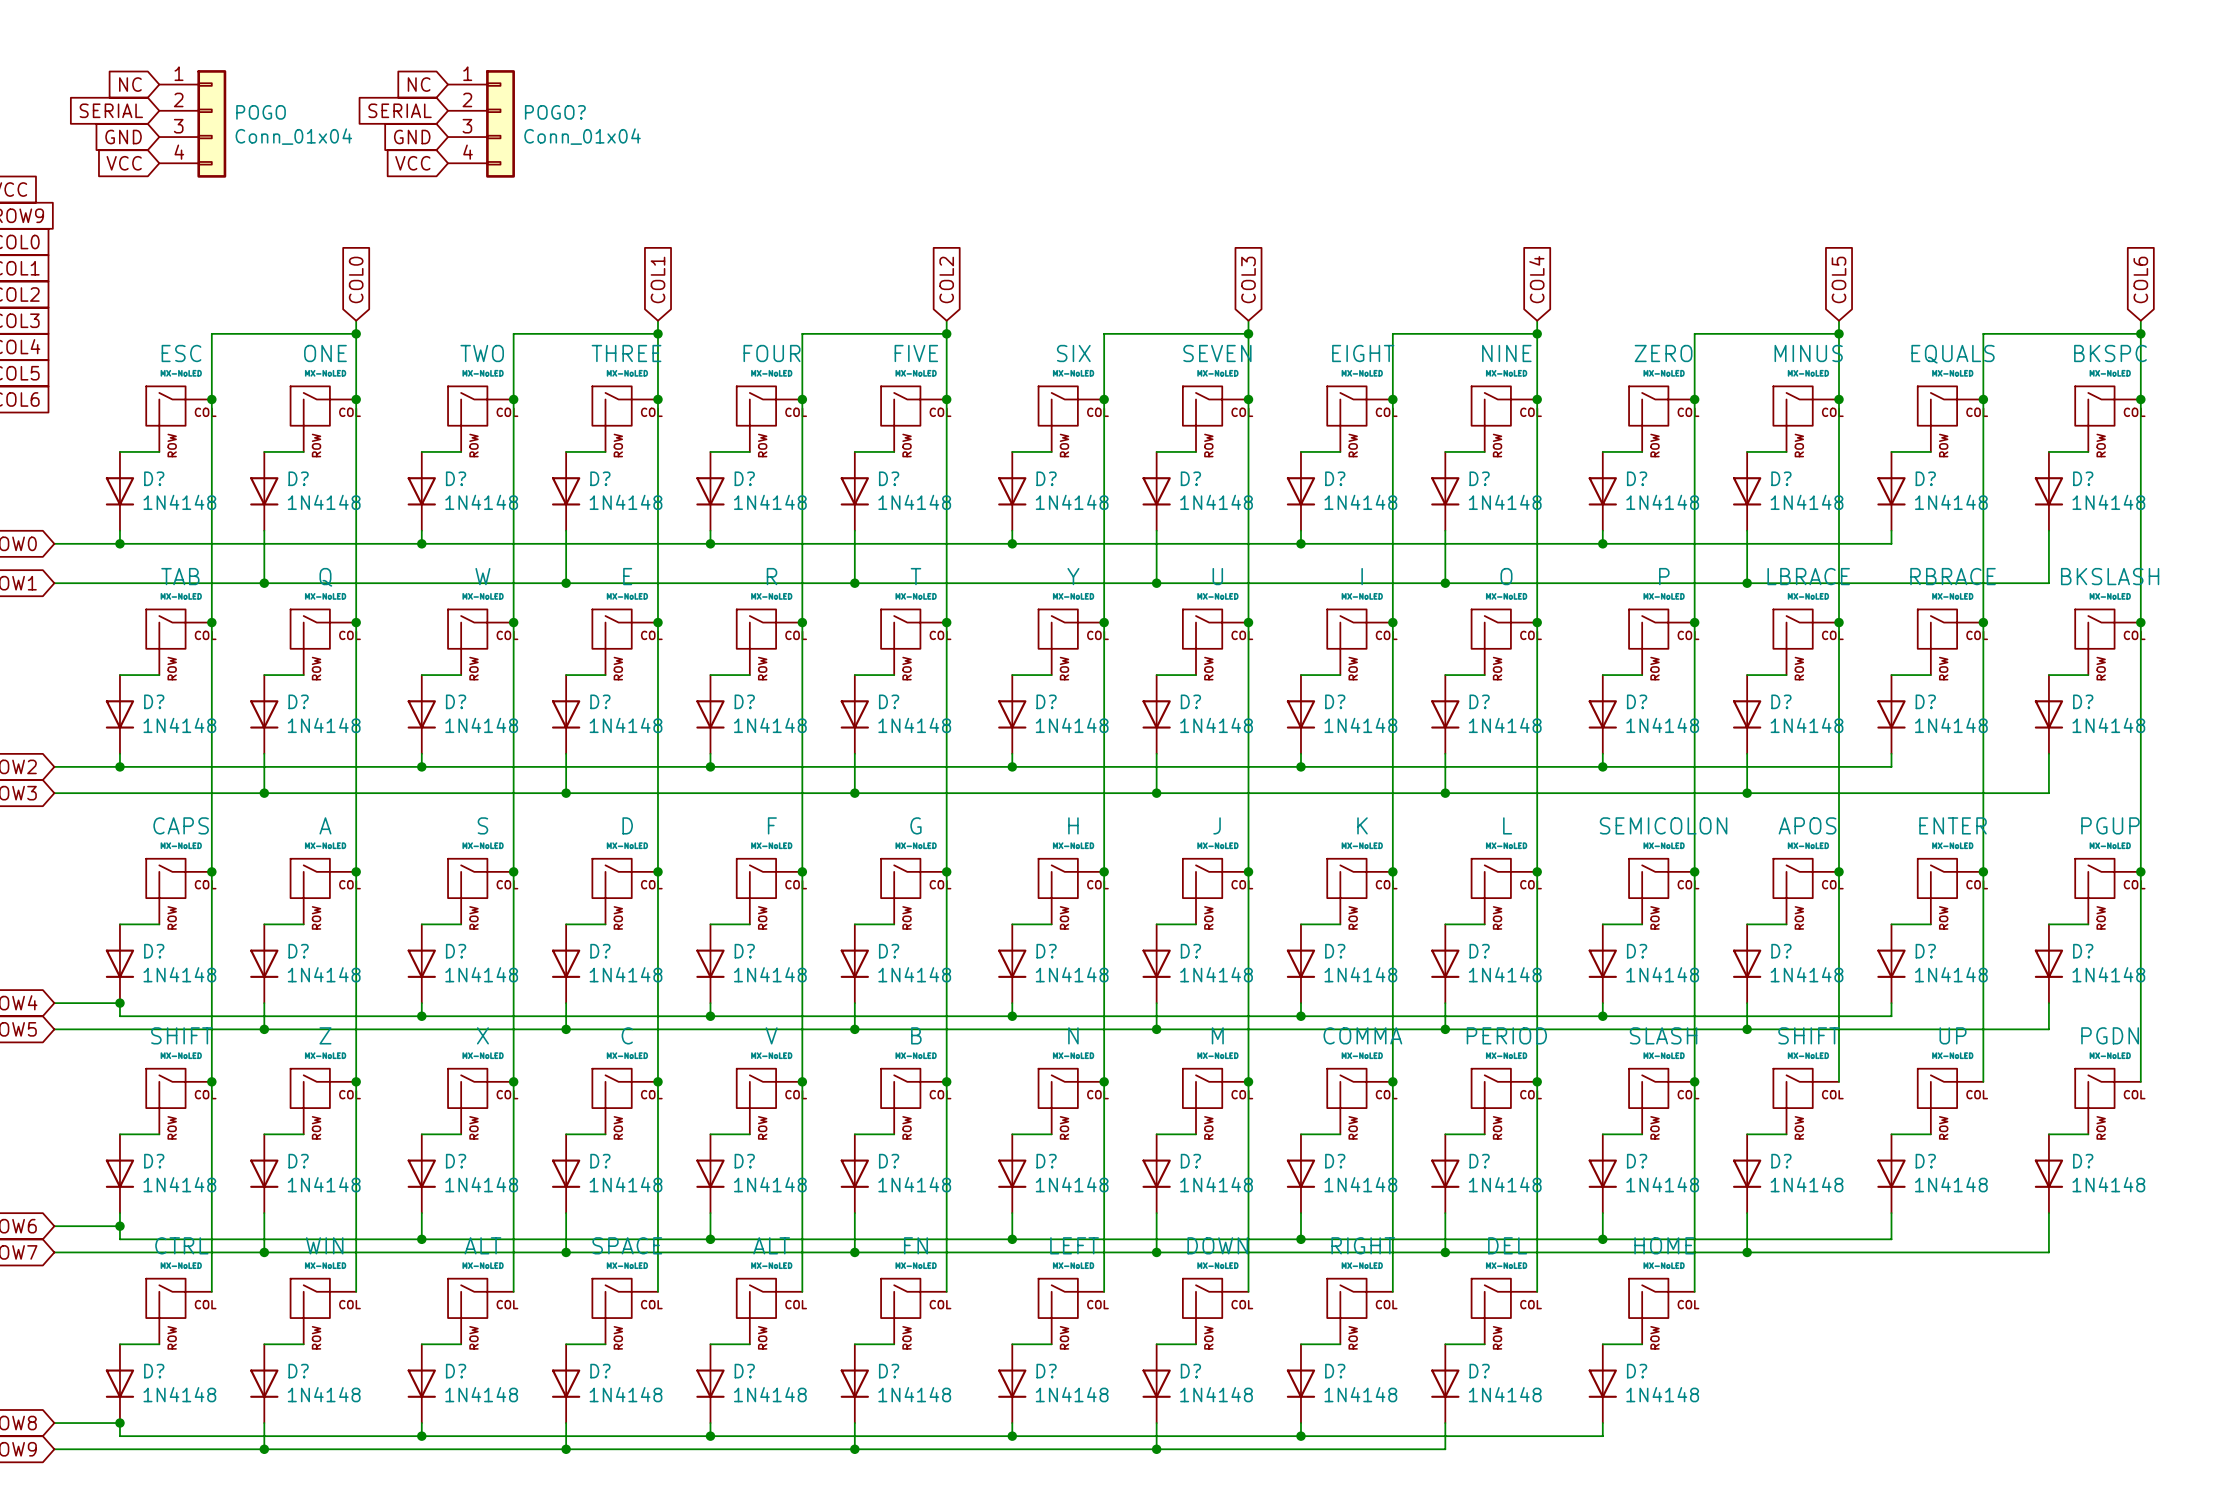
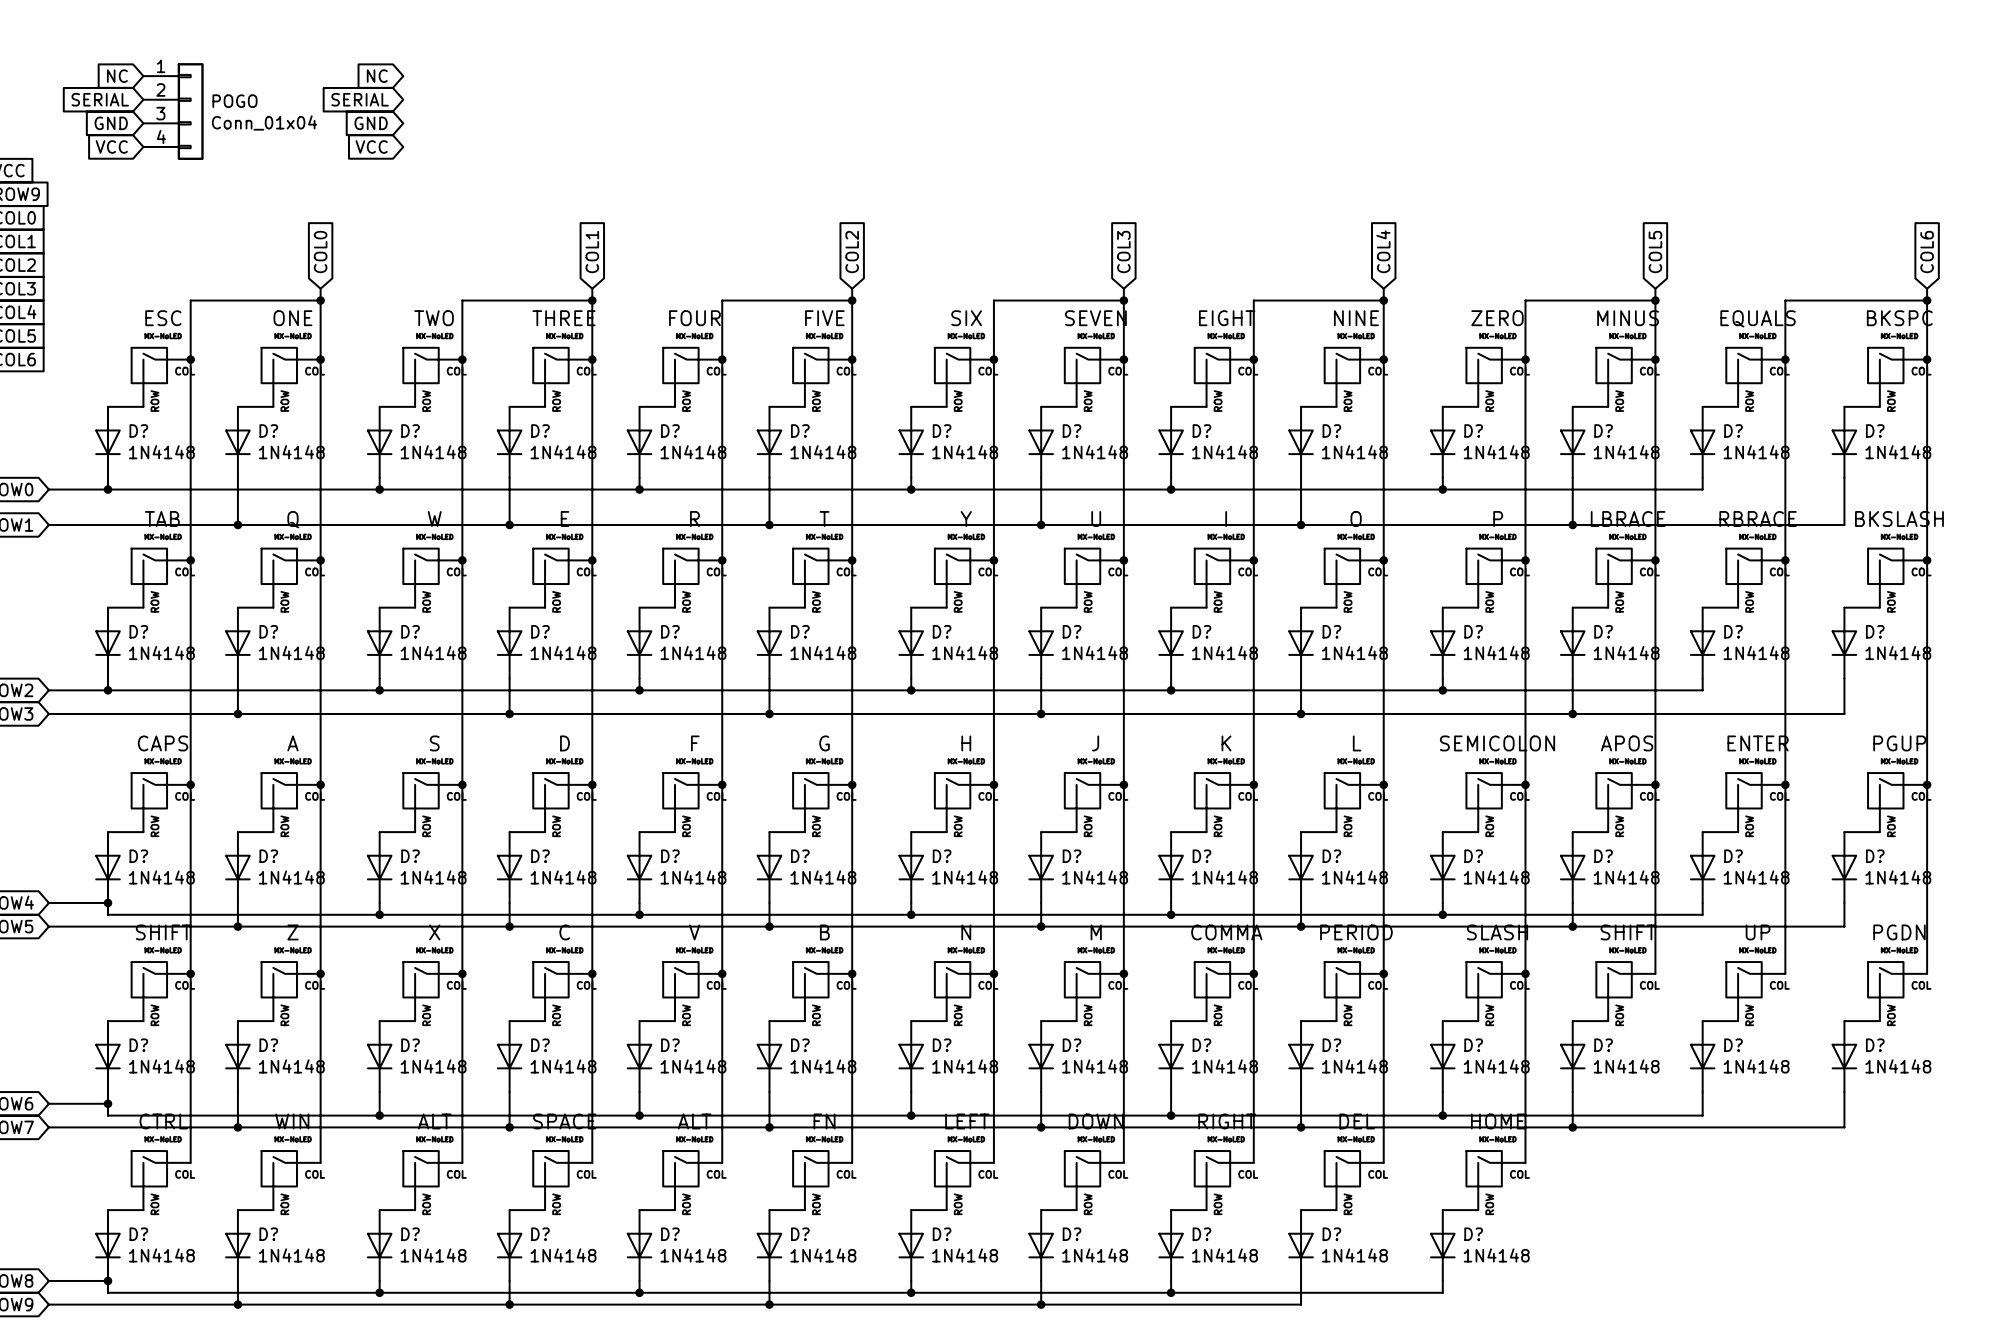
POGO?: Conn_01x04 (481, 123) -> none

